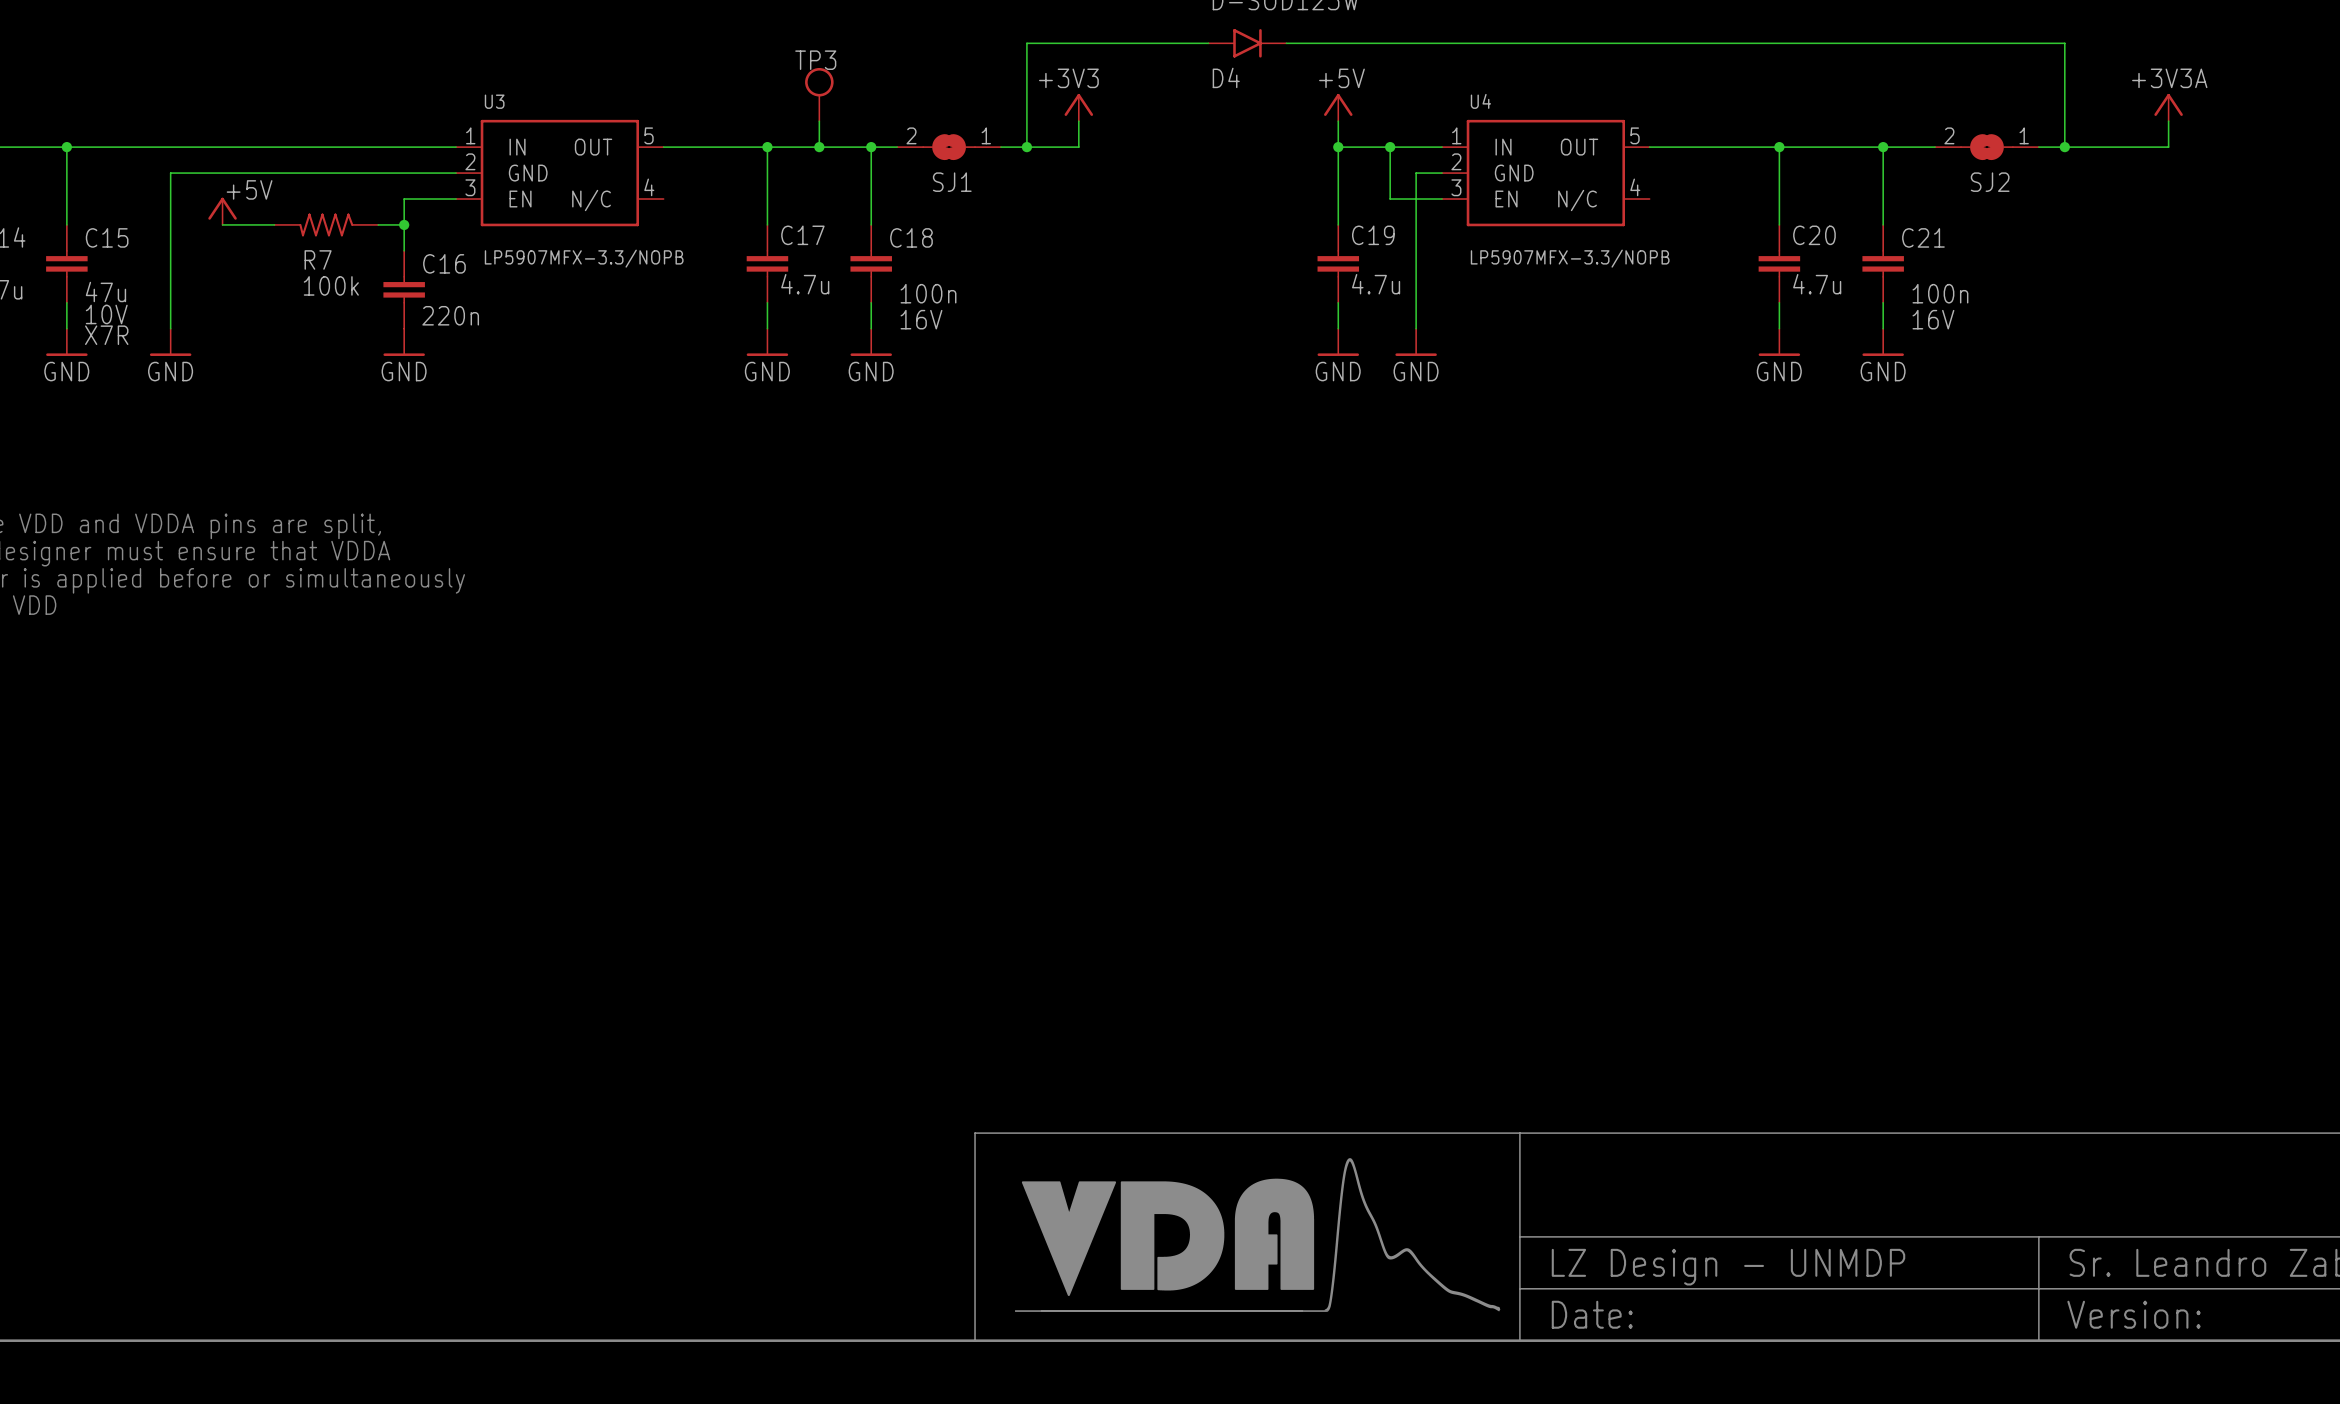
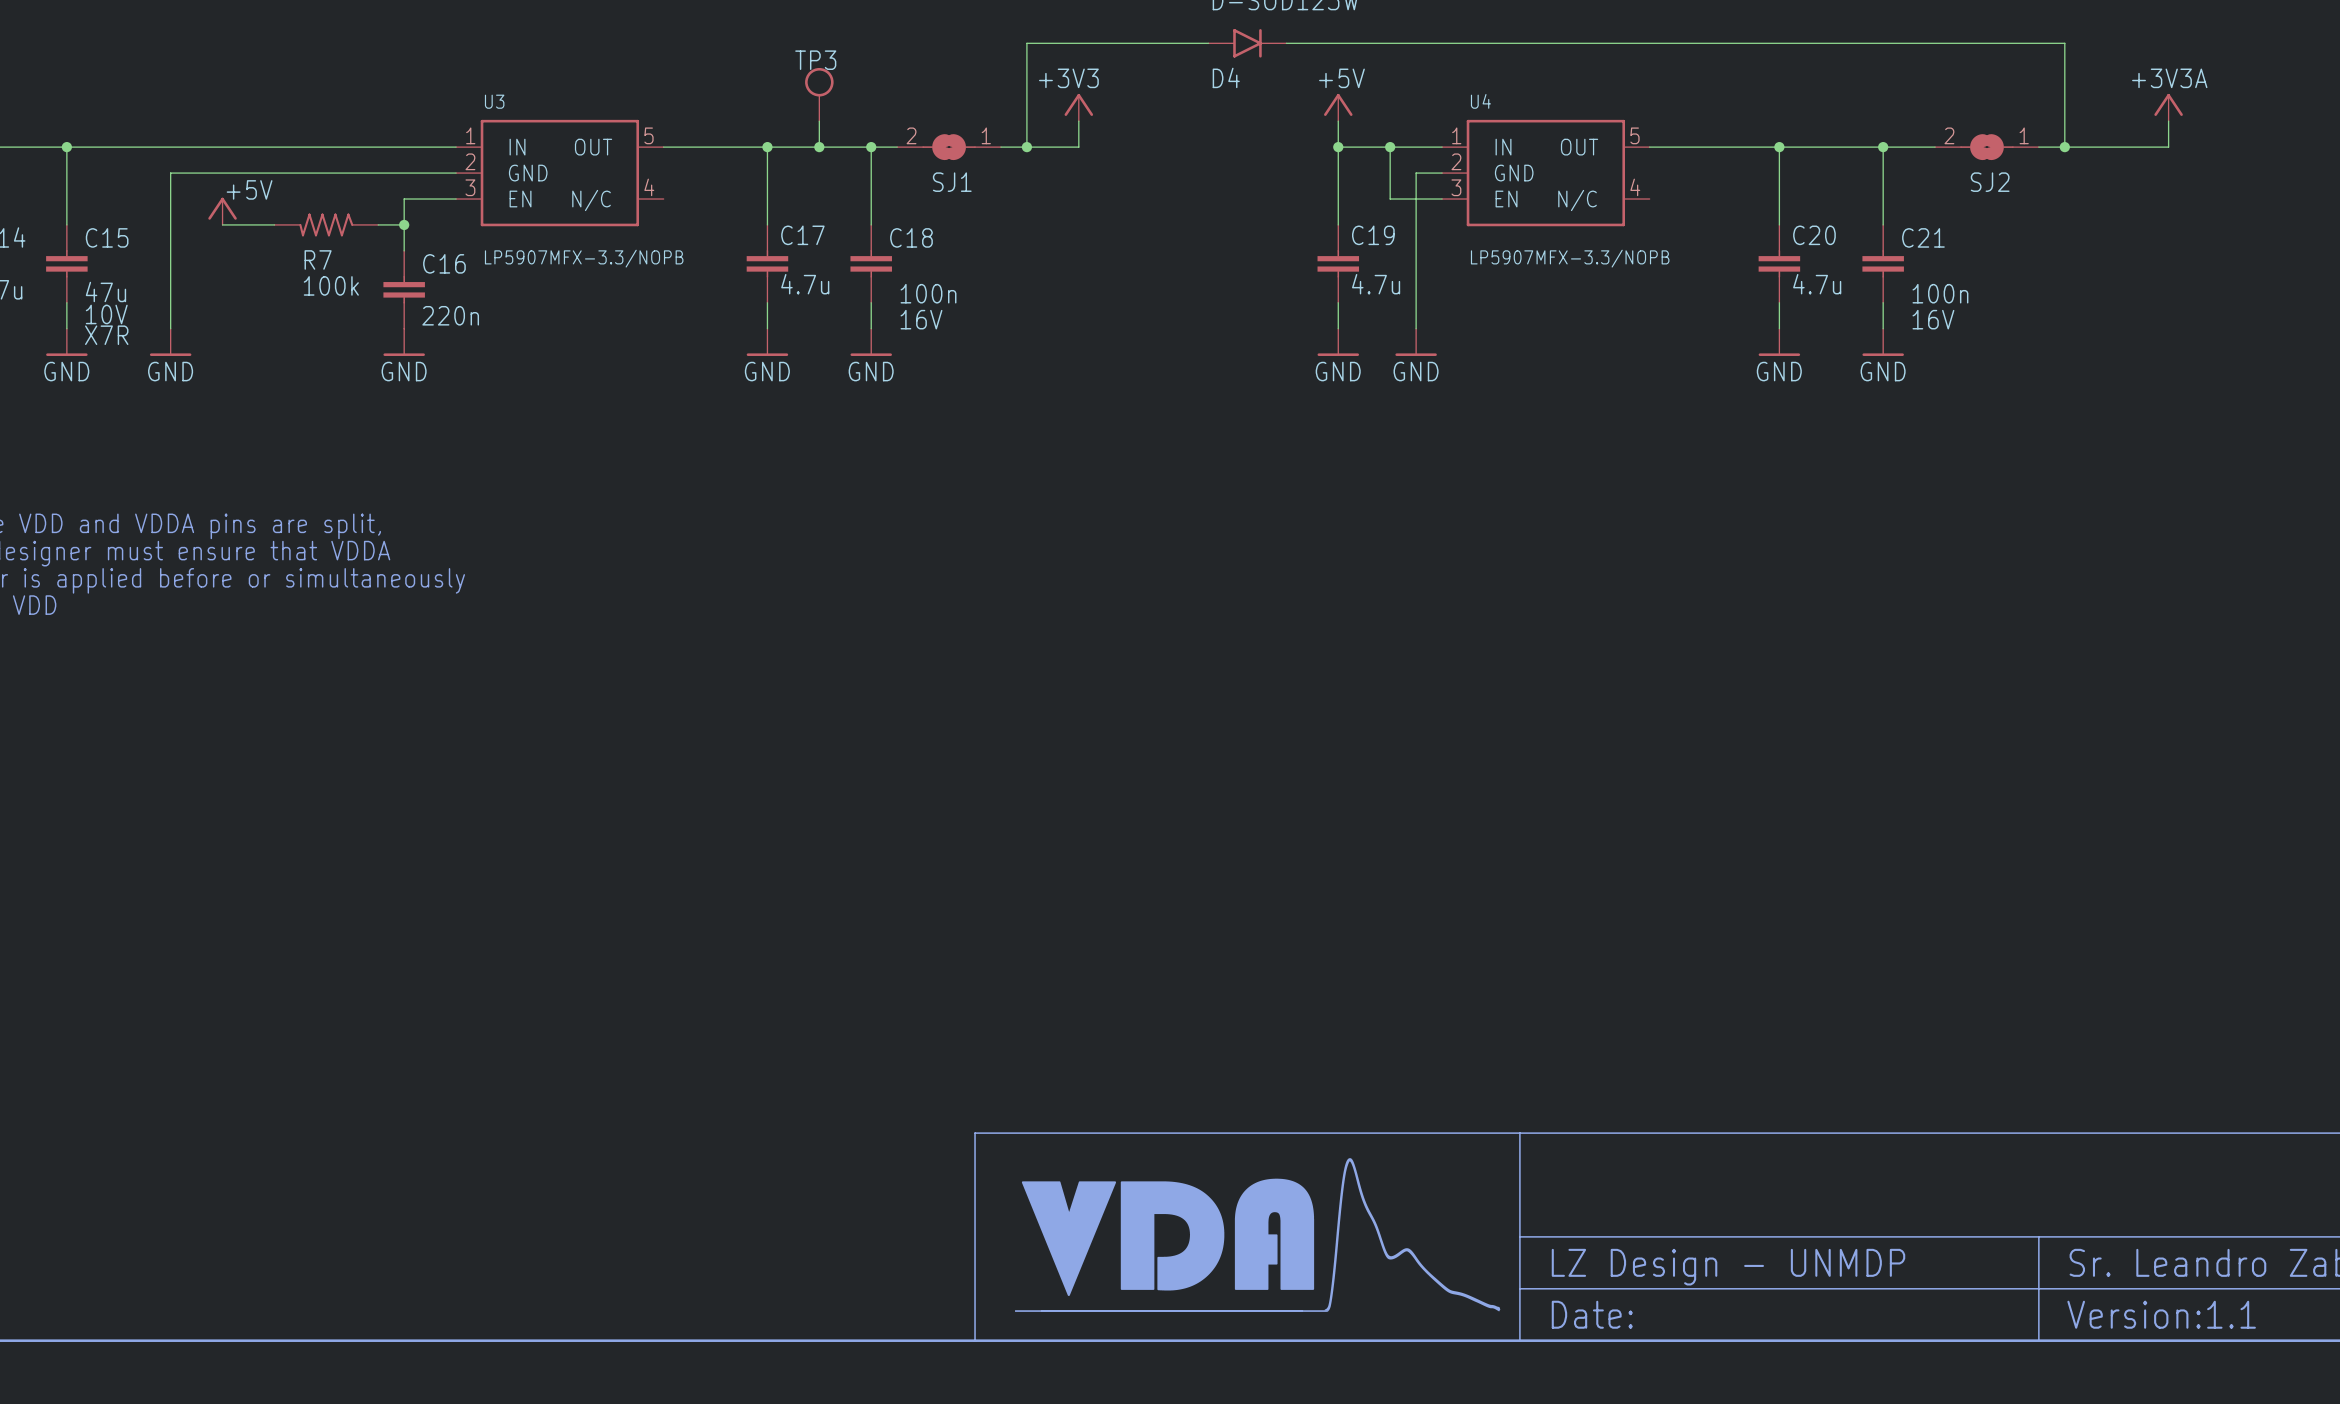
text: none -> 1.1 (2231, 1314)

